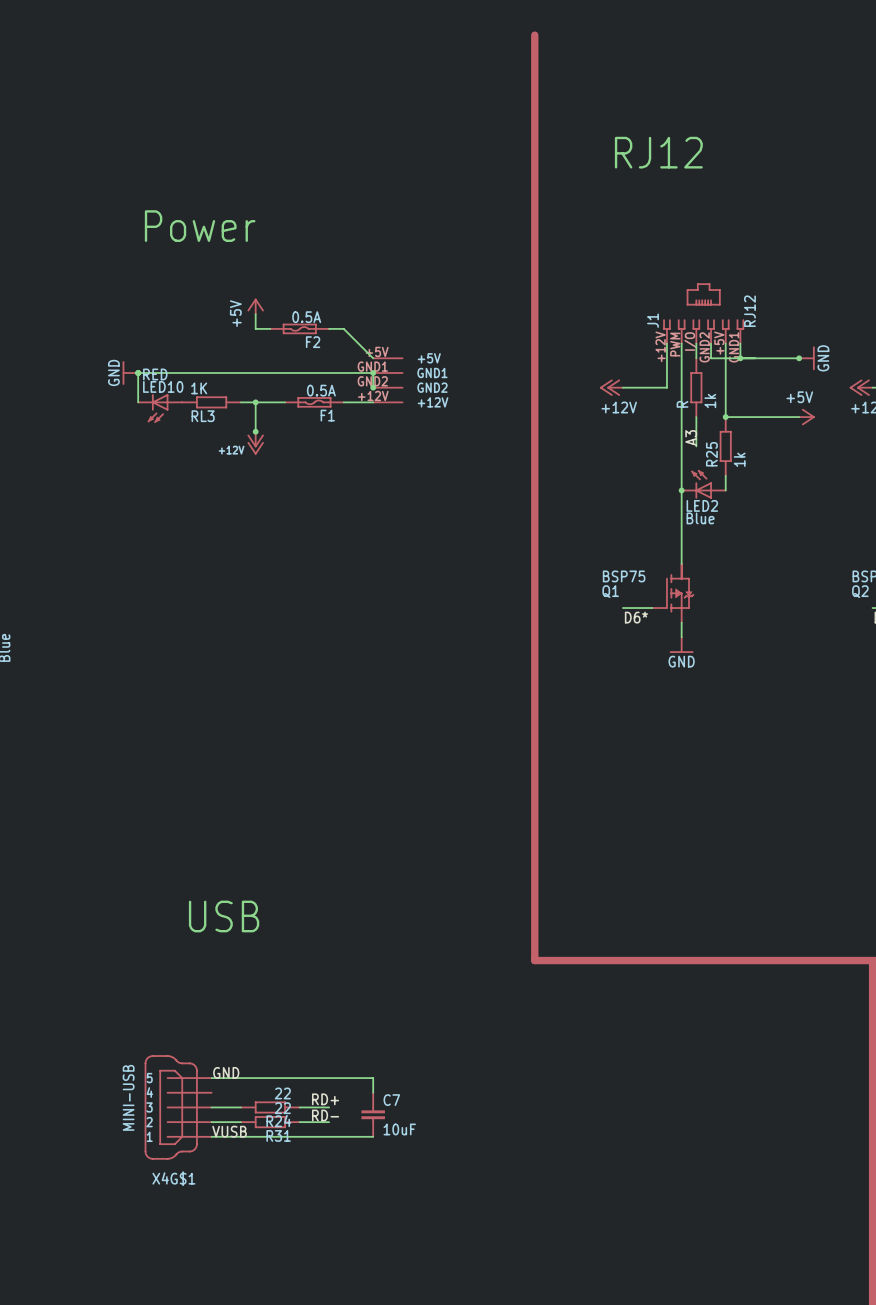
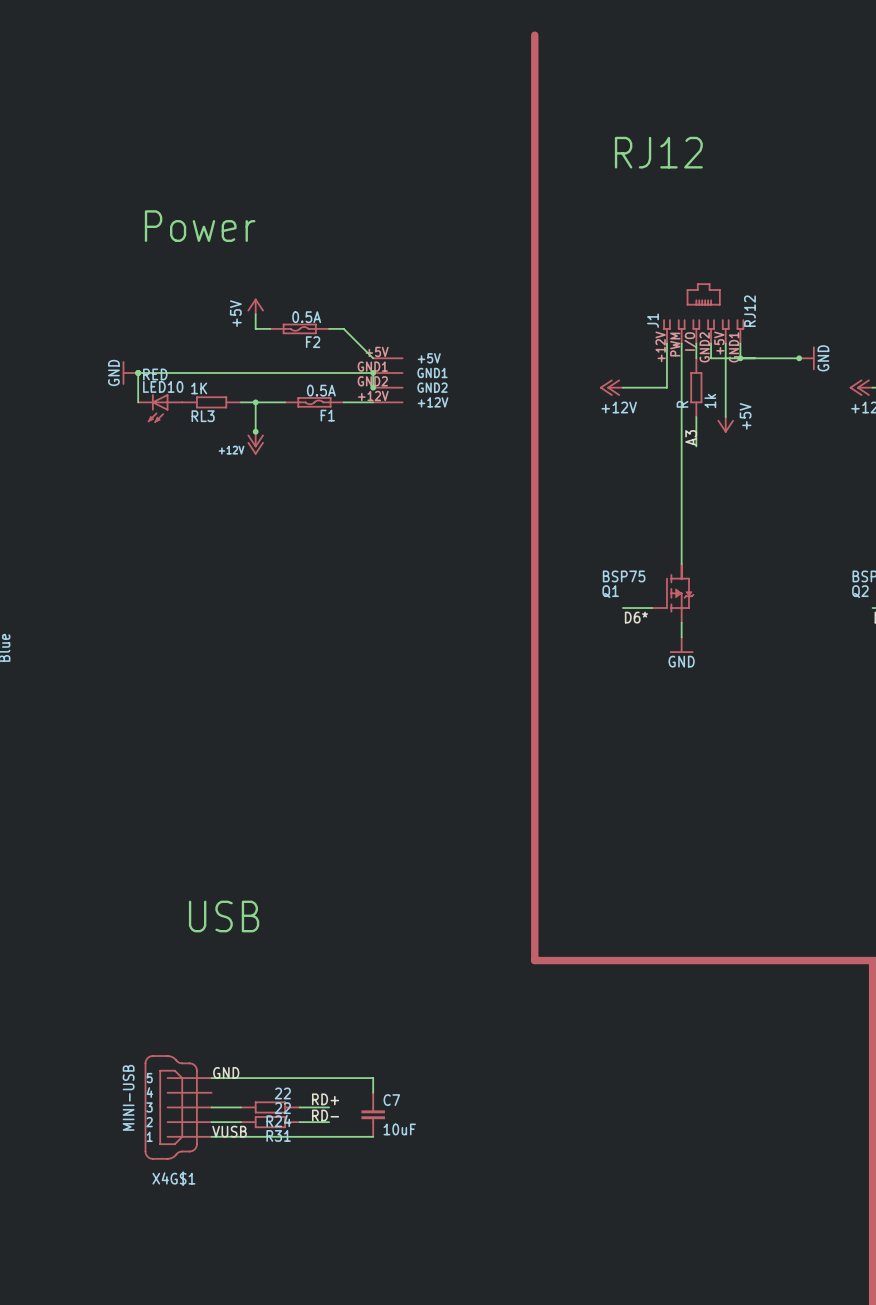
wire: (725, 417) (799, 417) -> none
junction: (725, 417) -> none
power symbol position: +5V (806, 417) -> +5V (725, 424)
power symbol rotation: 0° (808, 417) -> 90° clockwise (725, 426)
R25: 1k (725, 446) -> none
wire: (725, 475) (725, 490) -> none
LED2: Blue (703, 484) -> none
junction: (681, 490) -> none

